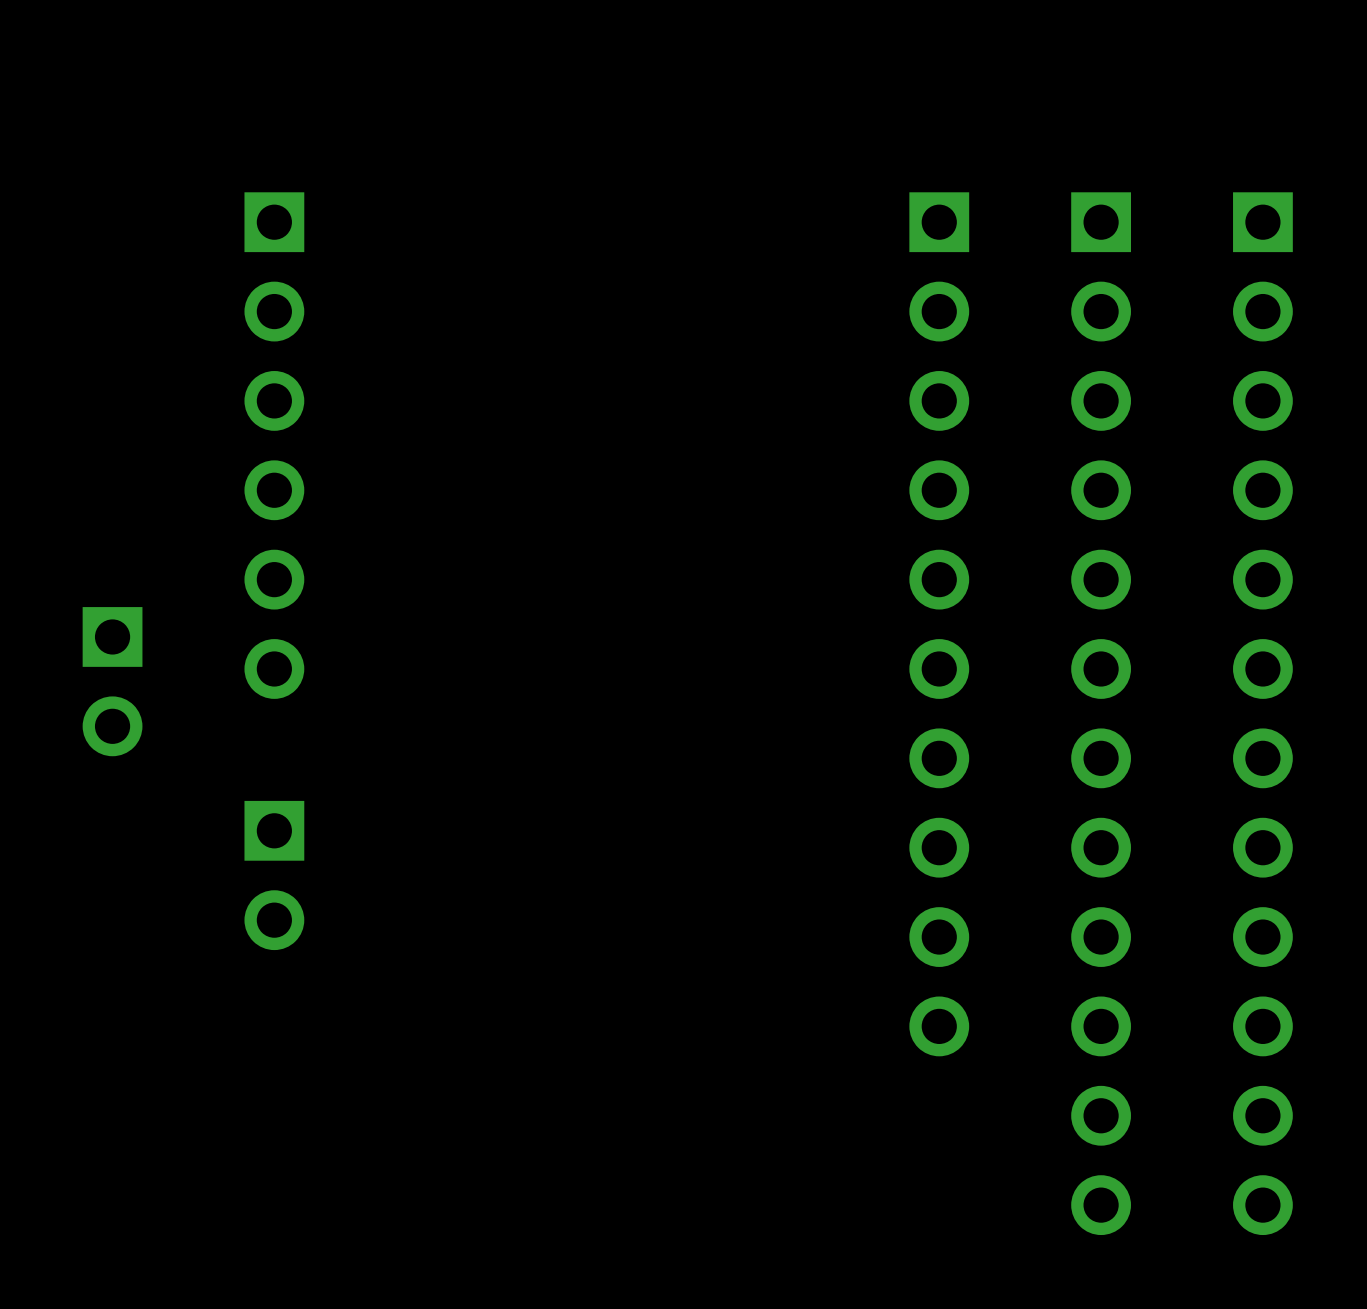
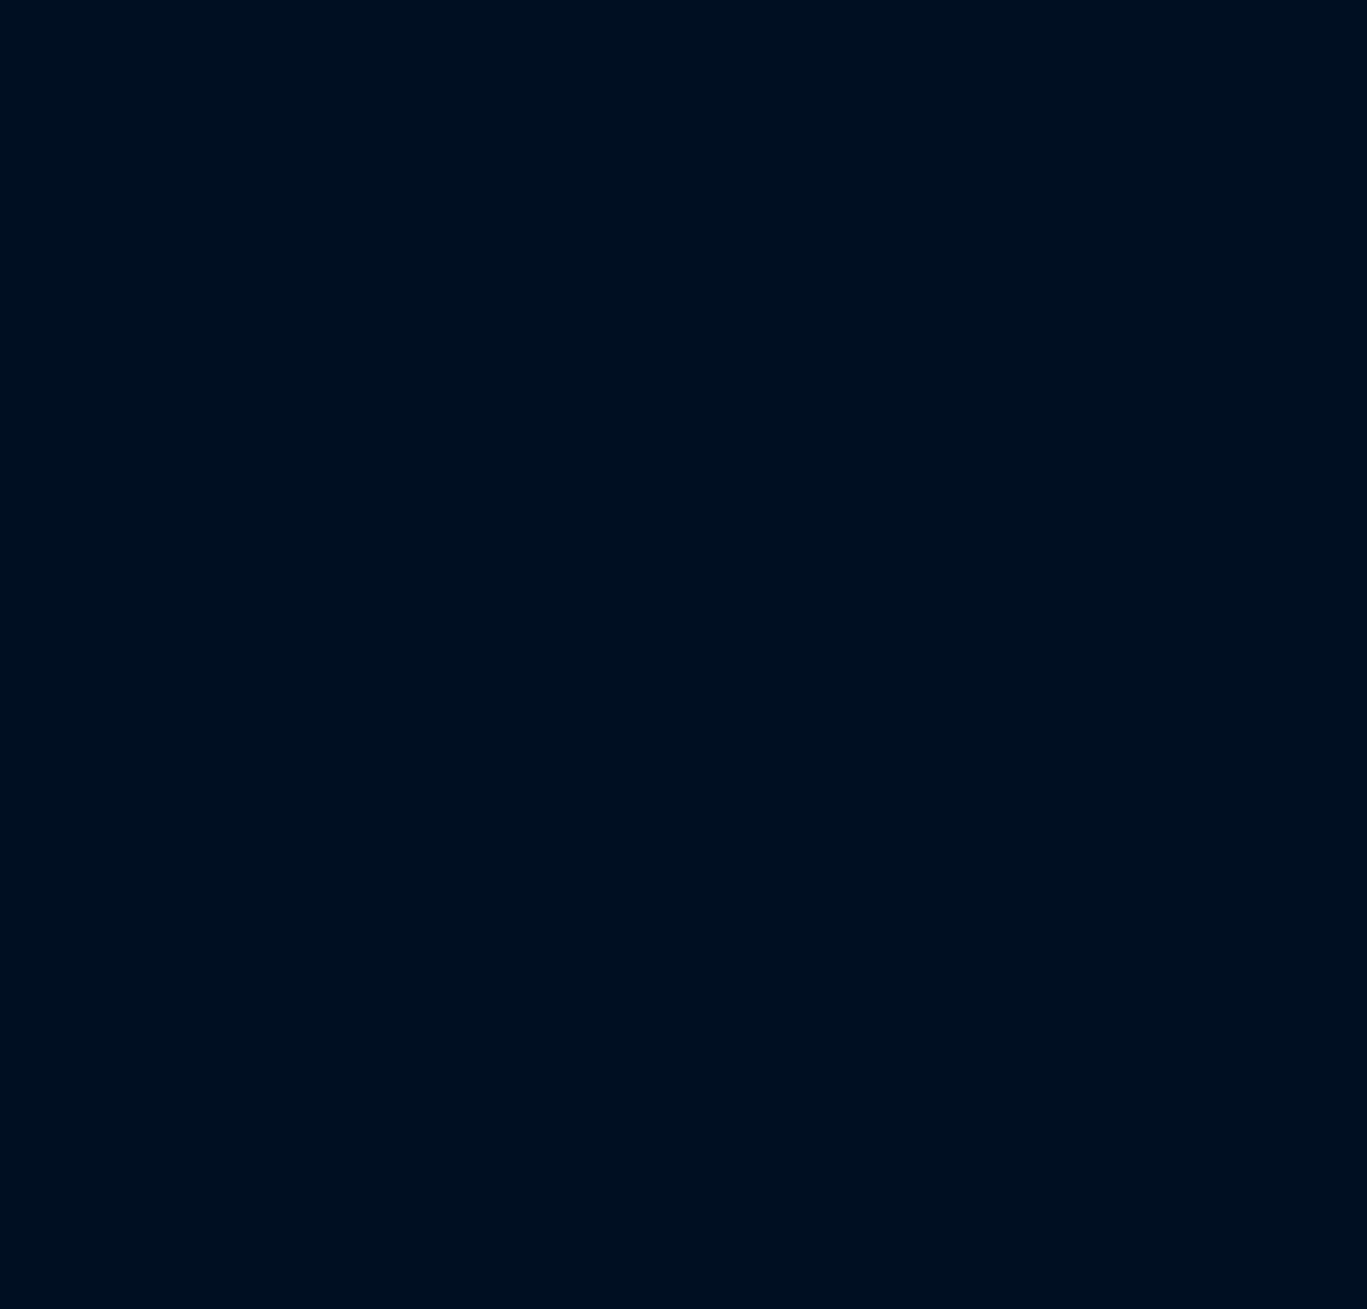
part: (274, 445) -> none
part: (939, 624) -> none
part: (112, 681) -> none
part: (1101, 713) -> none
part: (1262, 713) -> none
part: (274, 875) -> none

